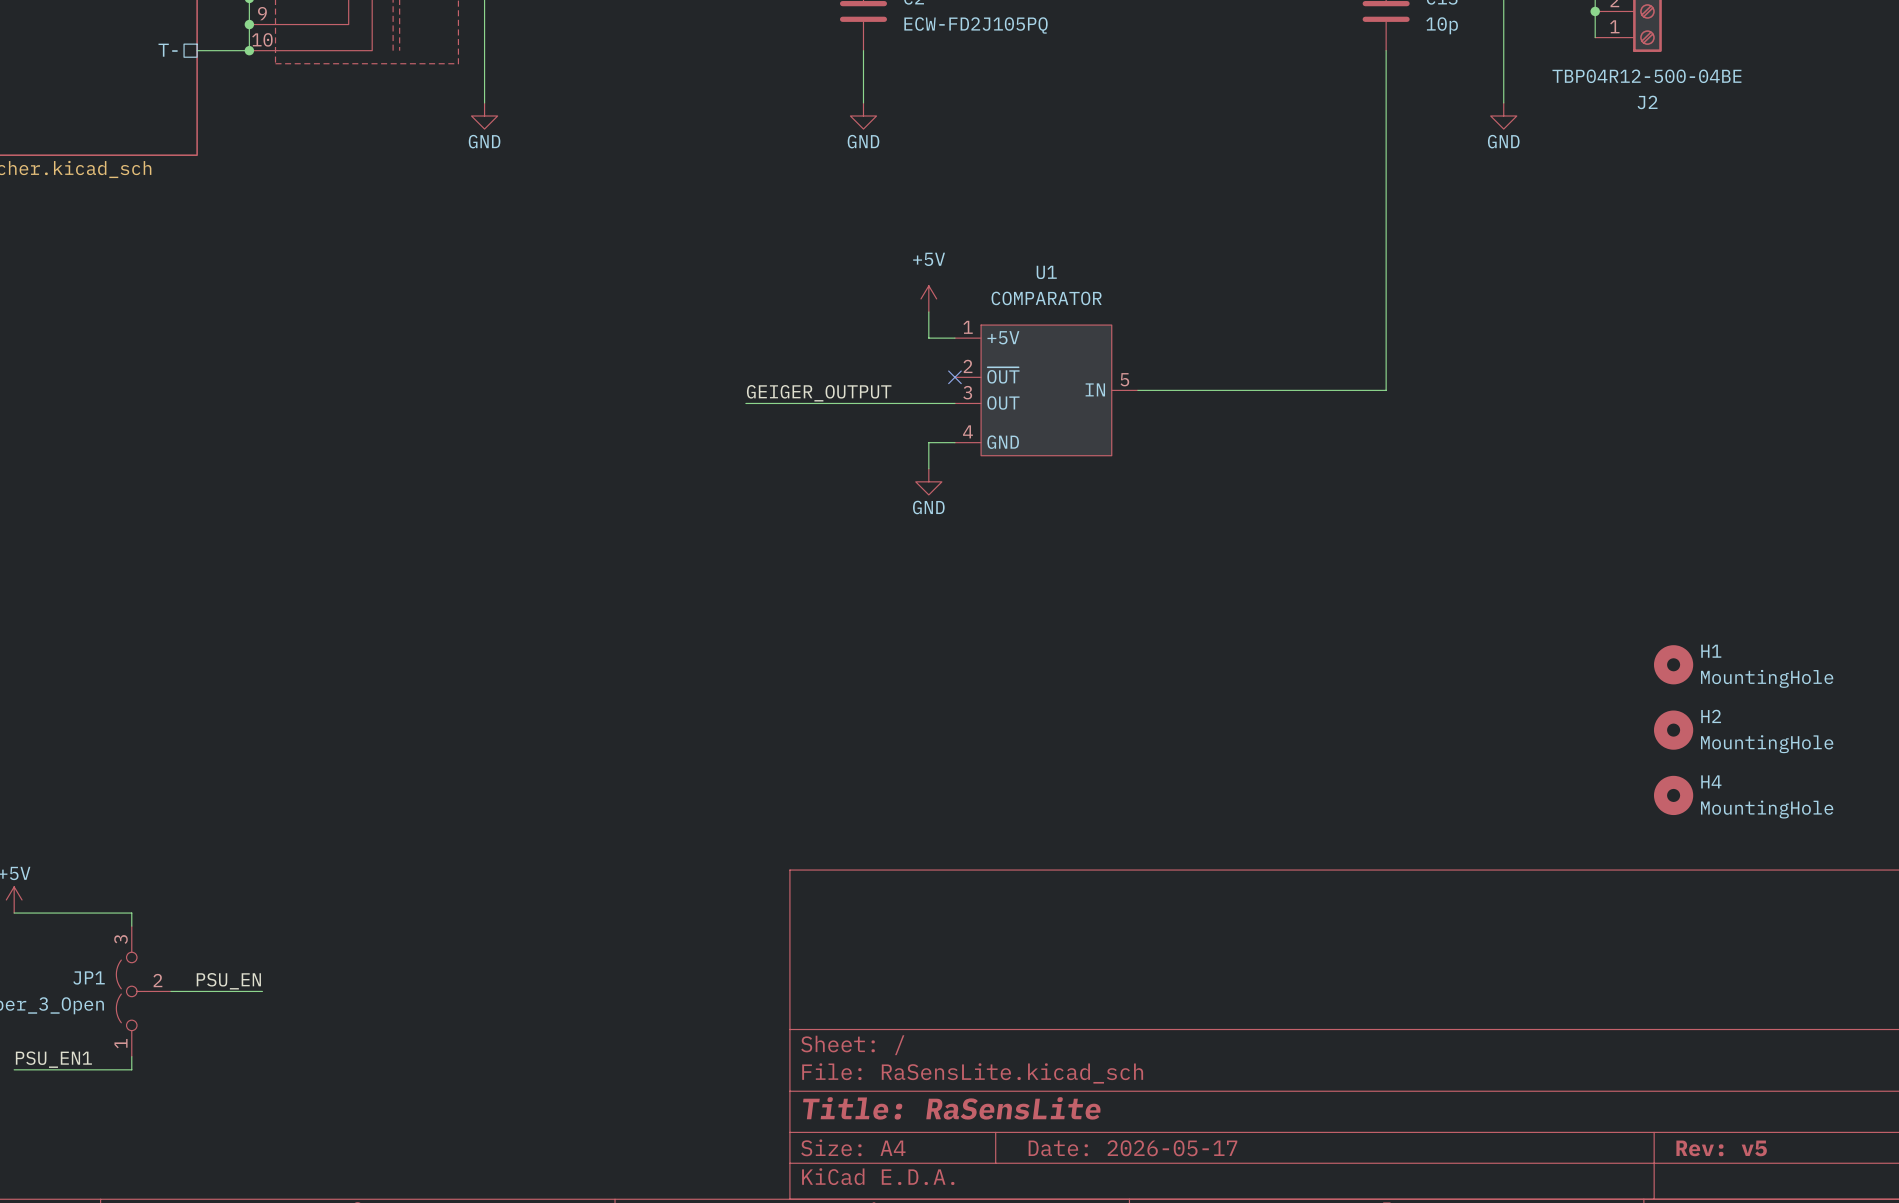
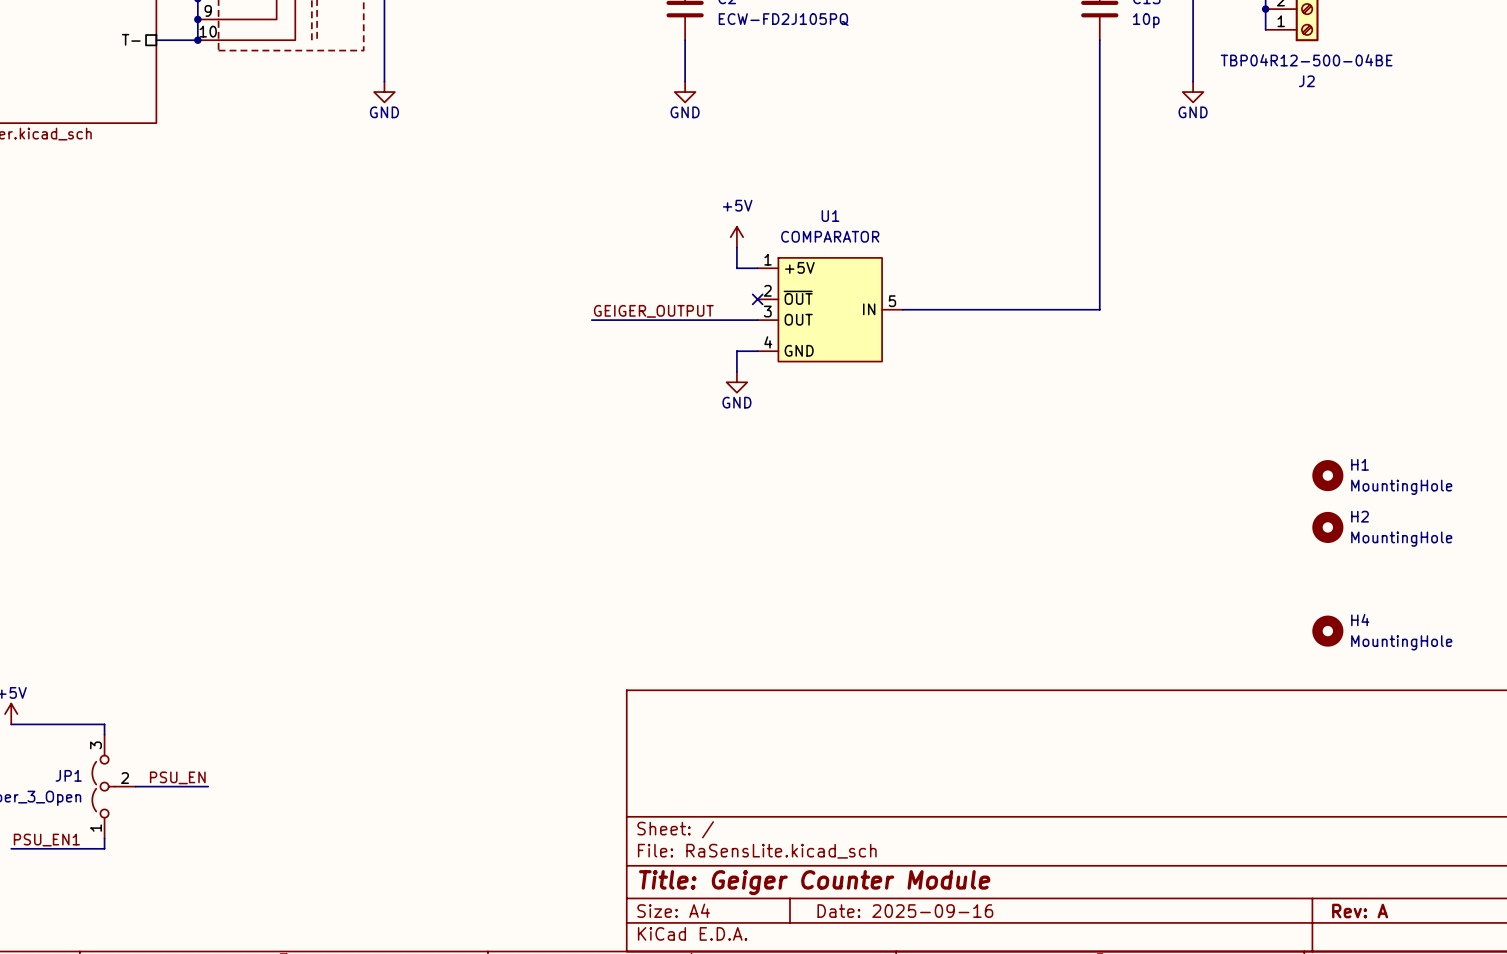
H1: none -> MountingHole (1327, 475)
H1 name: H1 (1711, 651) -> H2 (1360, 516)
H2: MountingHole (1673, 730) -> none
title block: Title: RaSensLite (951, 1108) -> Title: Geiger Counter Module (814, 882)
title block: Date: 2026-05-17 (1132, 1148) -> Date: 2025-09-16 (905, 911)
title block: Rev: v5 (1721, 1148) -> Rev: A (1360, 911)

